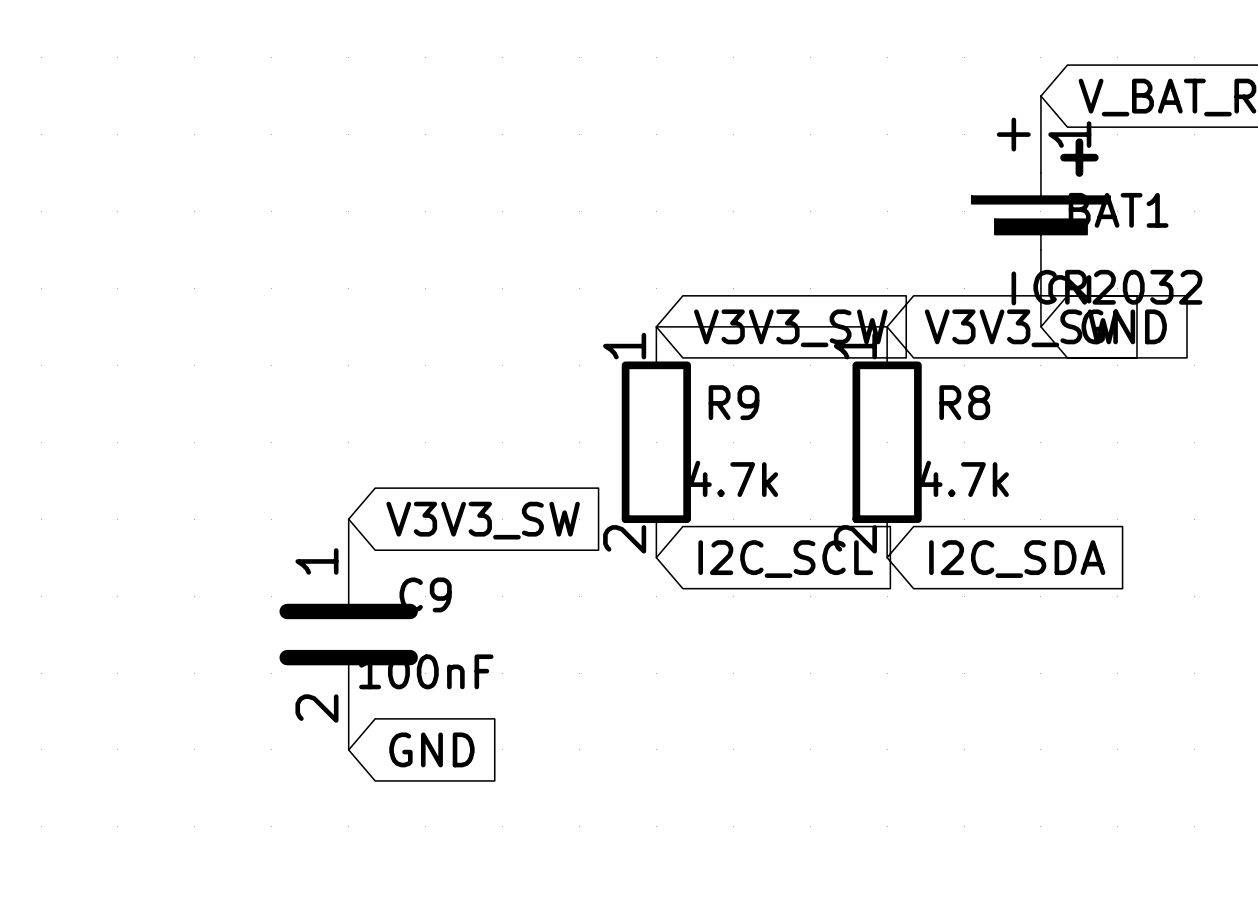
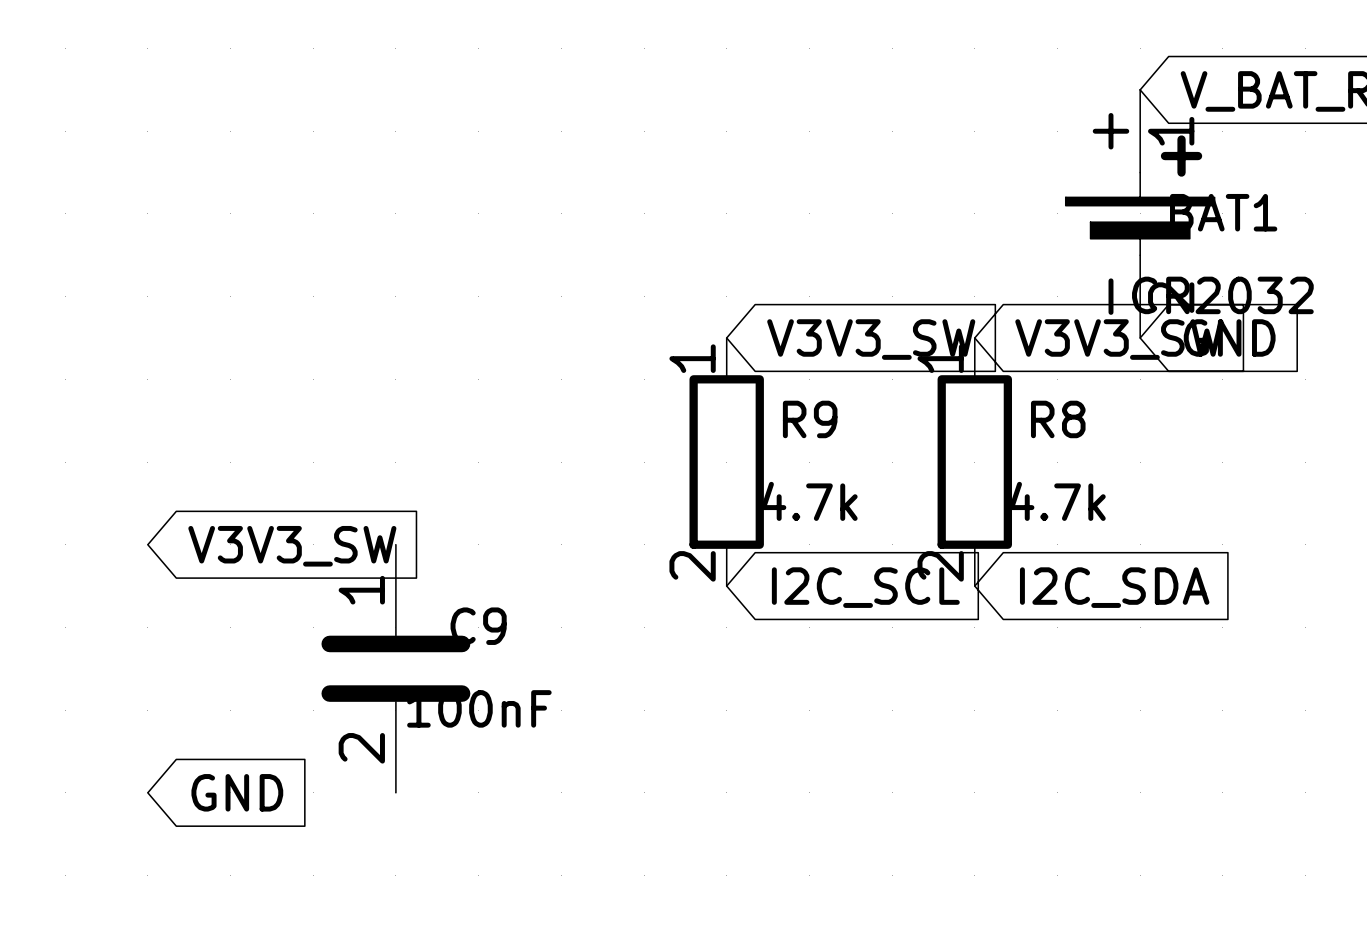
wire: (656, 326) (887, 326) -> none
global label position: V3V3_SW (483, 520) -> V3V3_SW (292, 546)
global label position: GND (431, 749) -> GND (237, 792)

